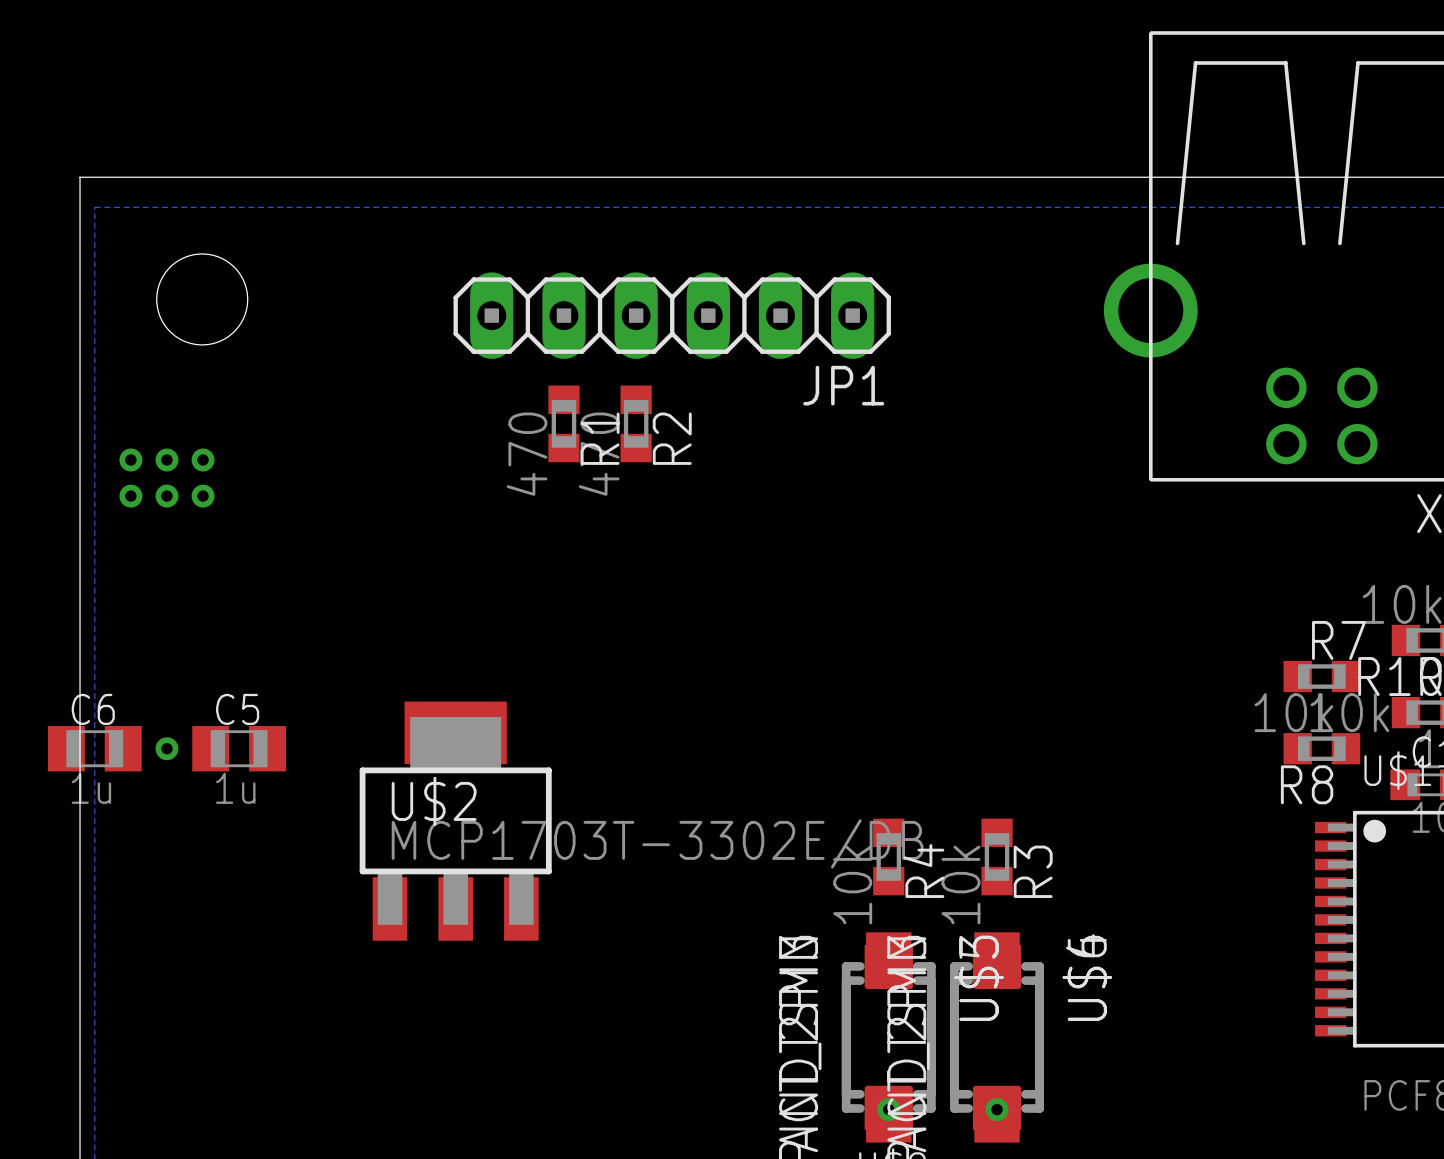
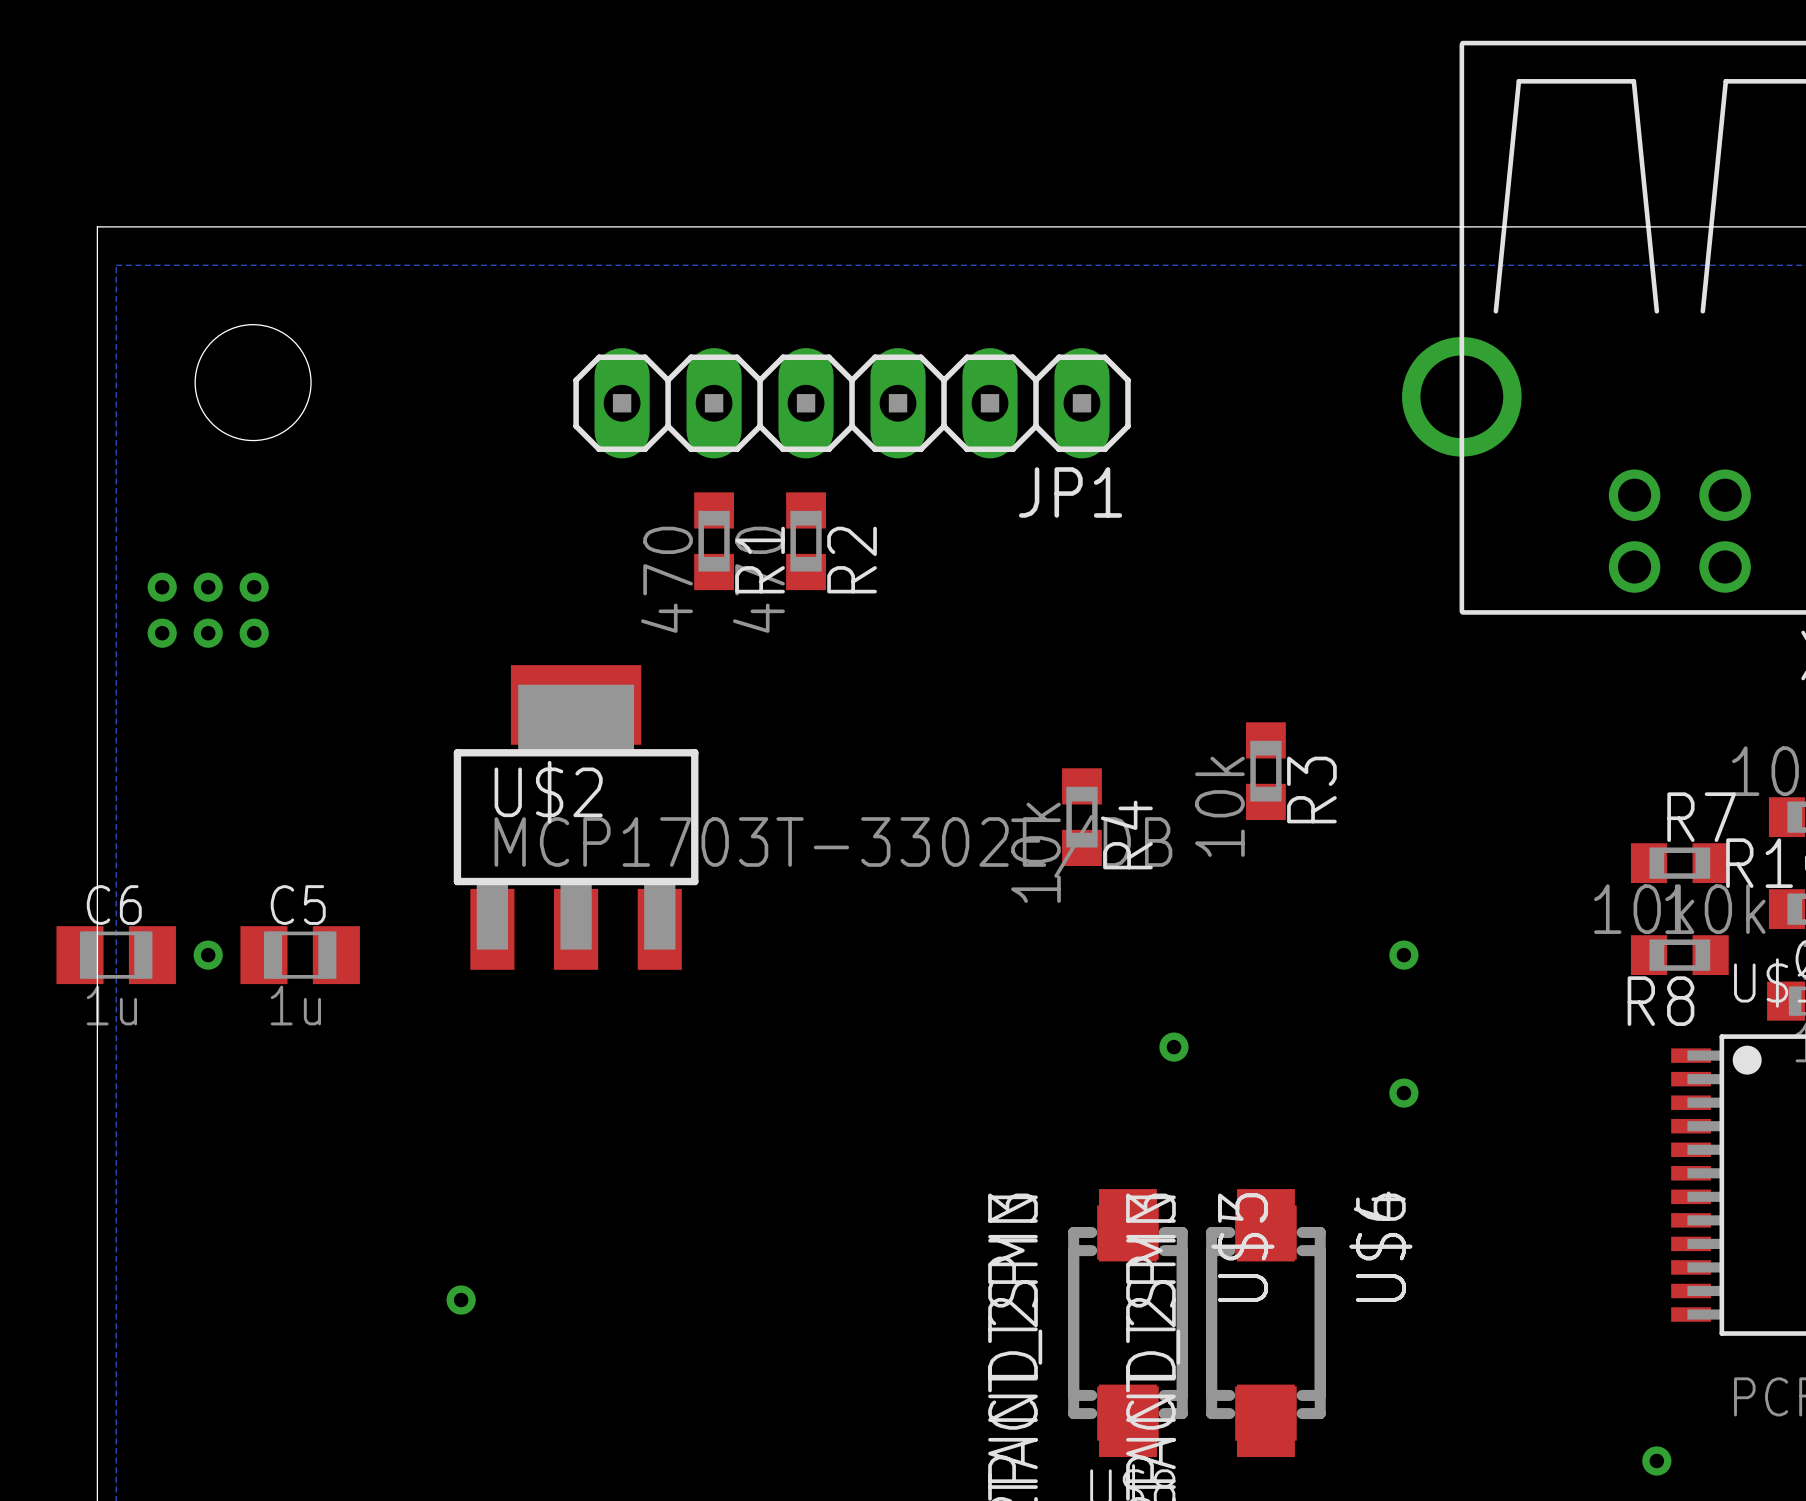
via: none -> (1403, 955)
via: none -> (1173, 1047)
U$2 position: (455, 821) -> (576, 817)
R4 position: (888, 856) -> (1081, 817)
R3 position: (997, 856) -> (1265, 771)
via: none -> (1403, 1093)
via: none -> (461, 1300)
via: (888, 1109) -> none
via: (997, 1109) -> none
via: none -> (1656, 1460)

